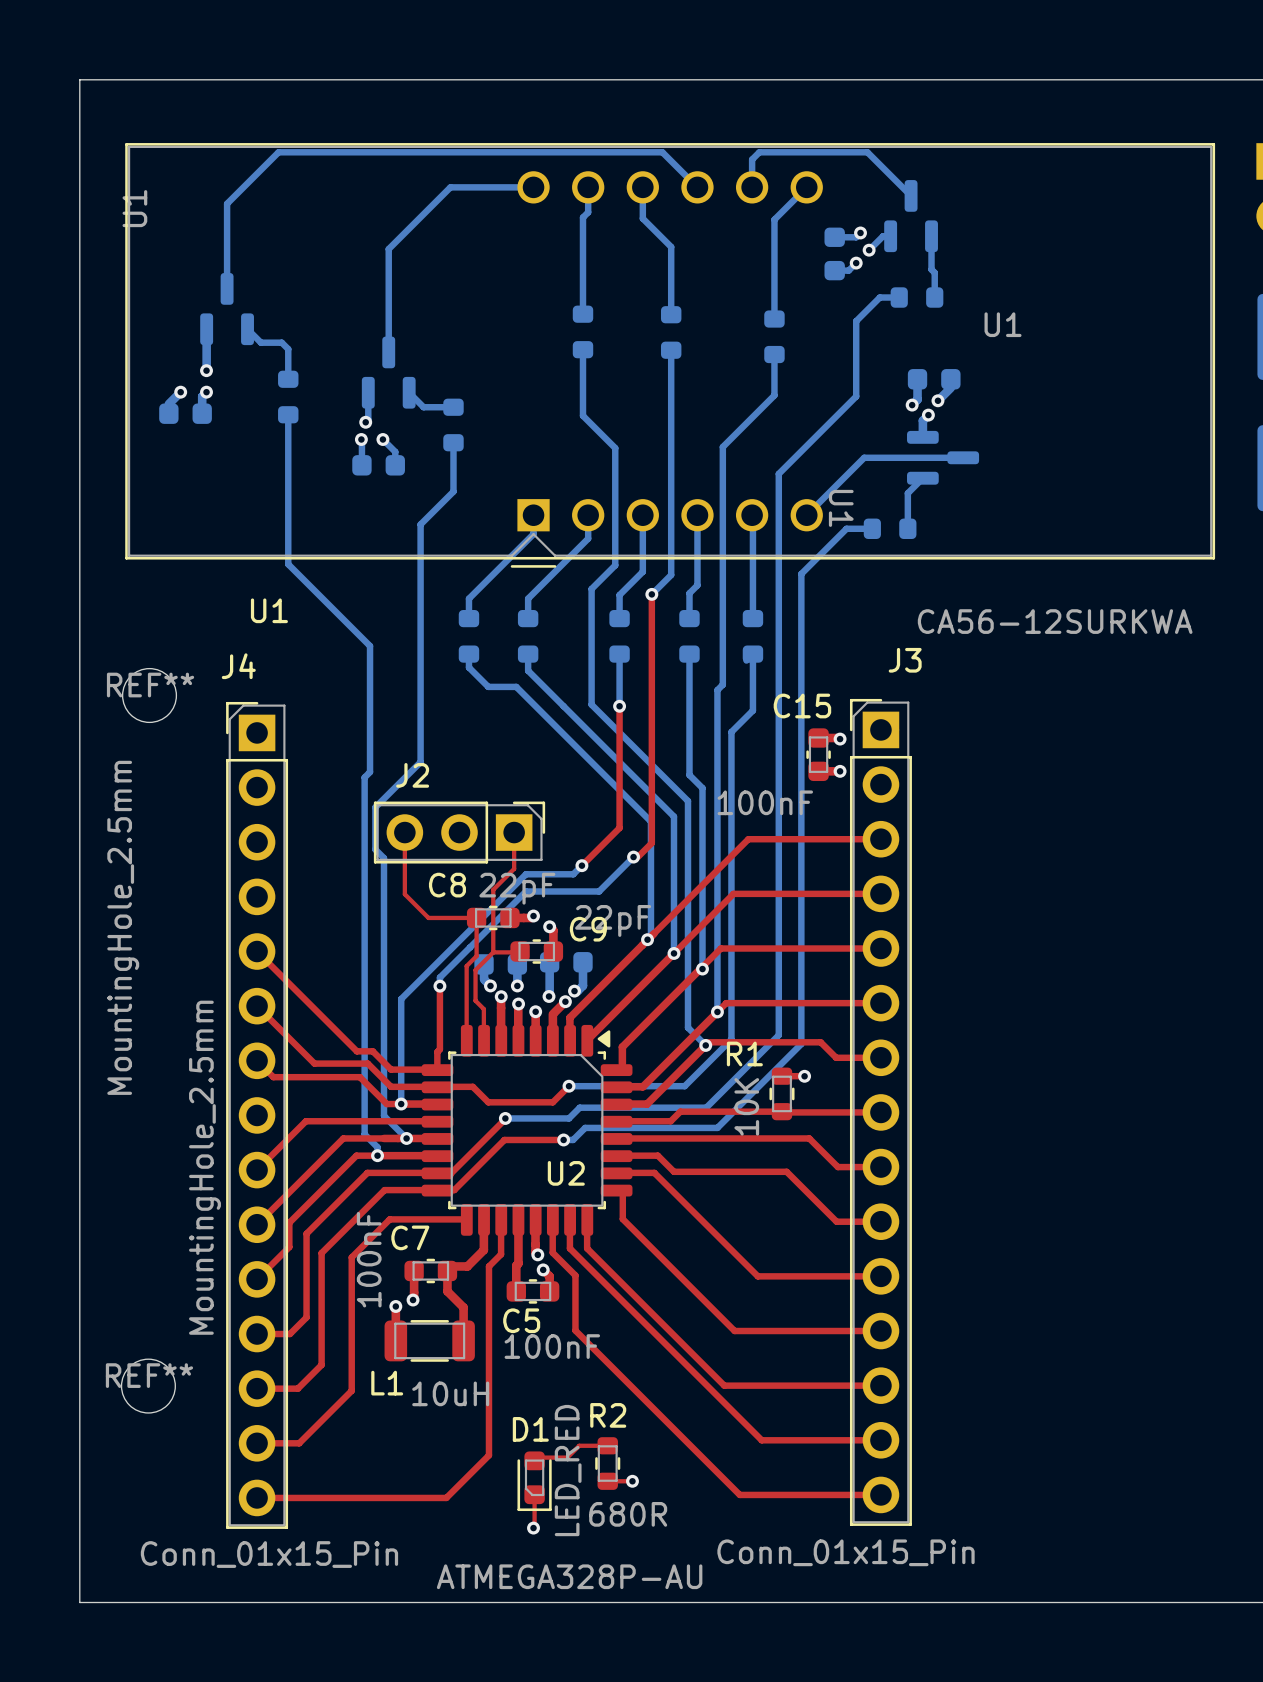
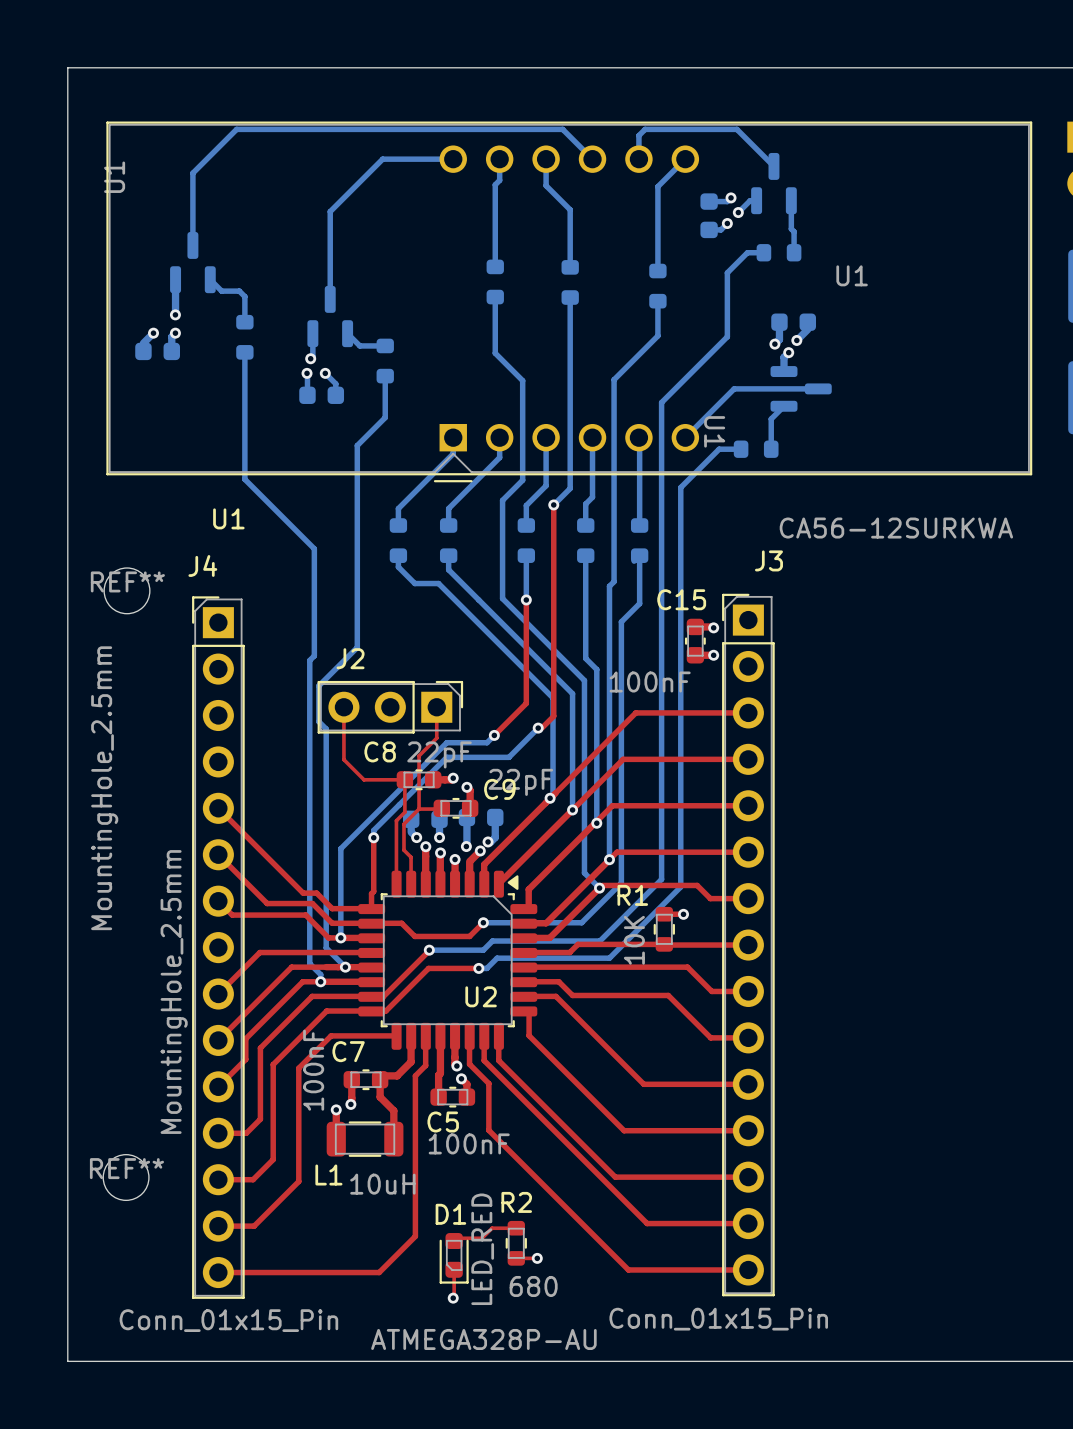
R2 value: 680R (628, 1514) -> 680 (533, 1286)

